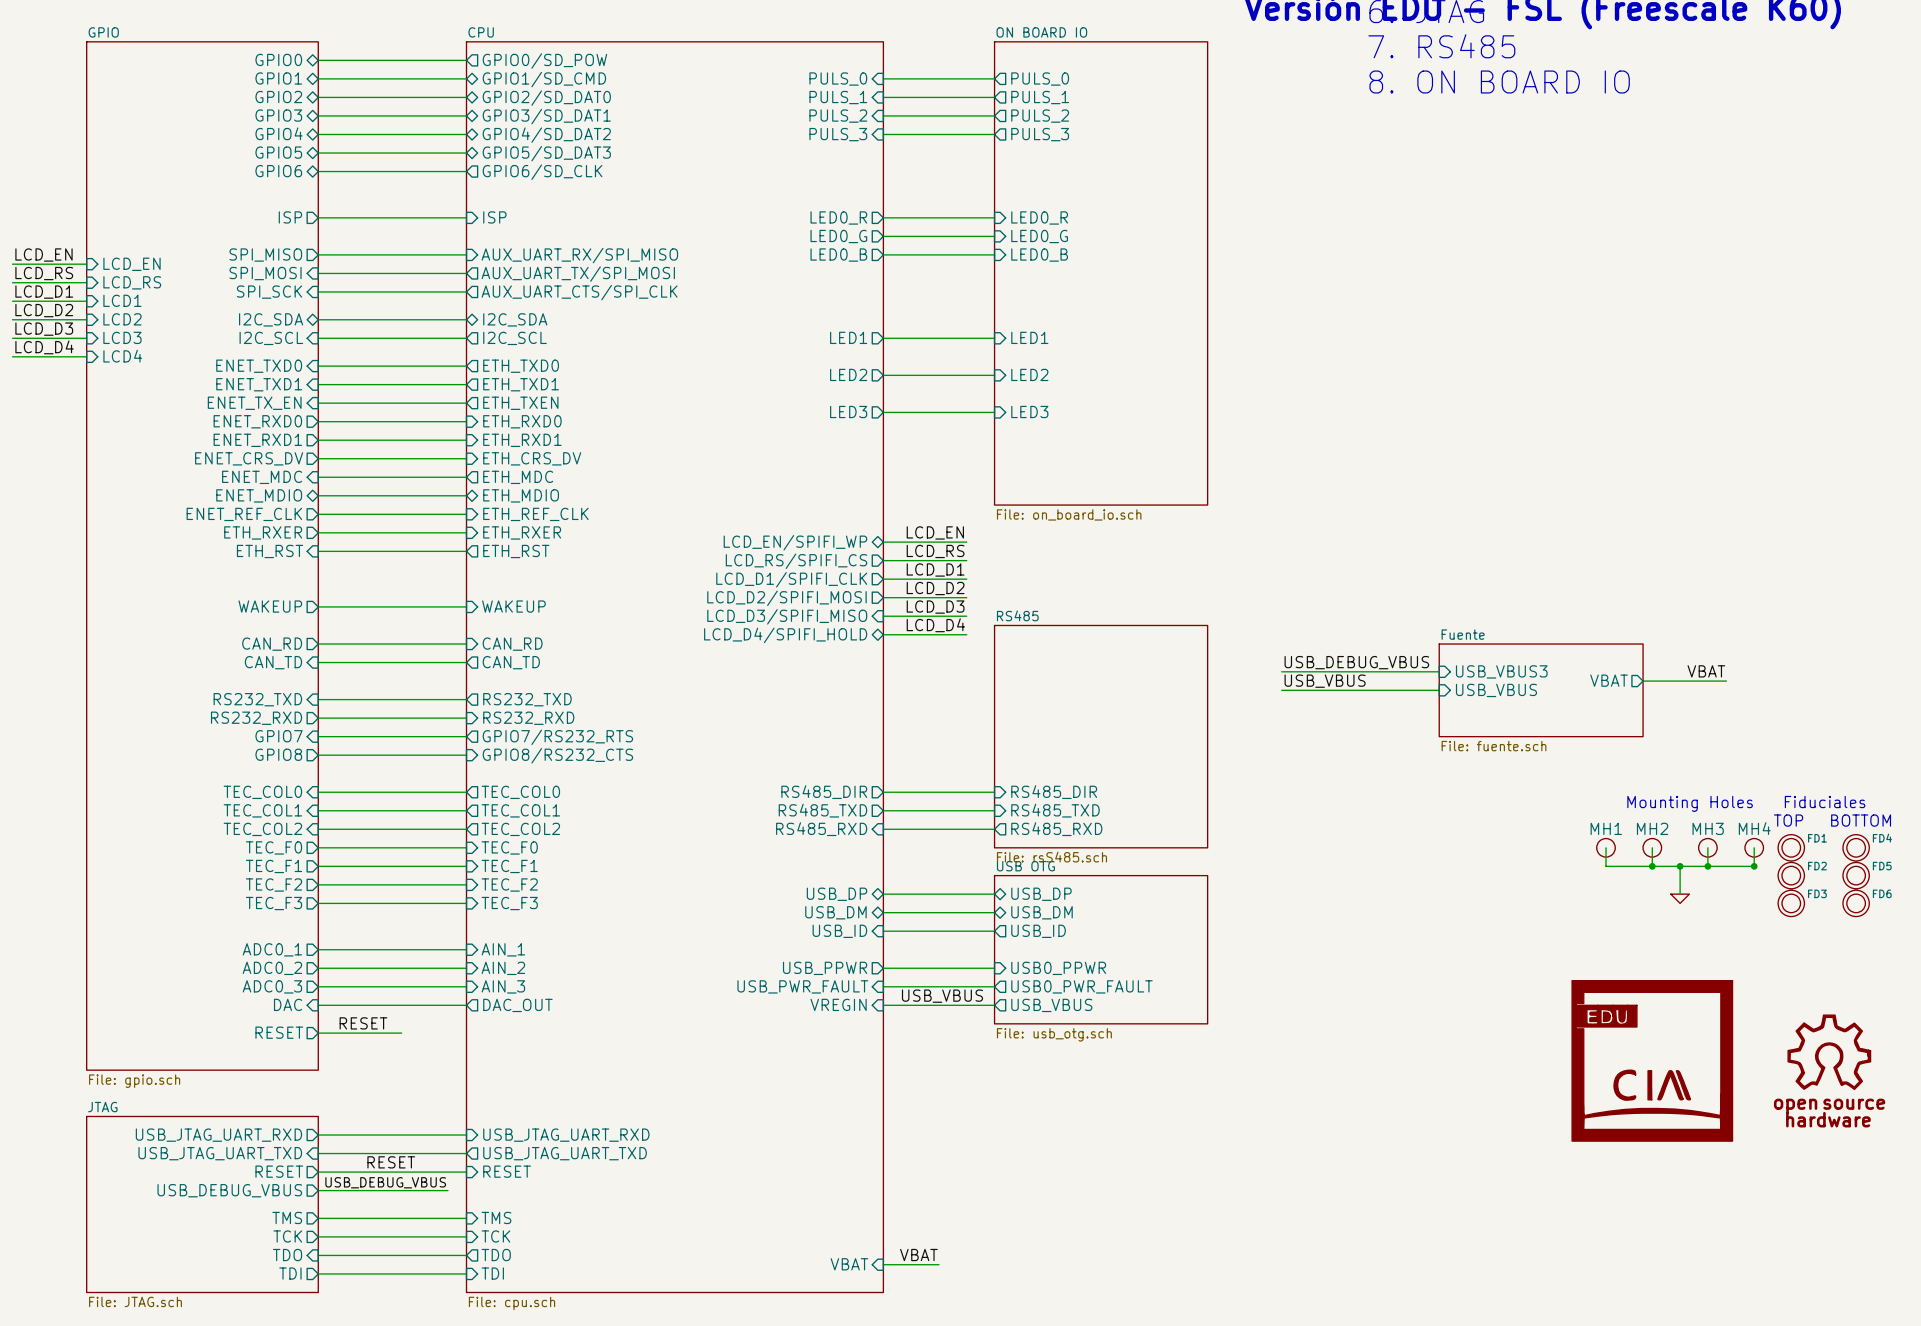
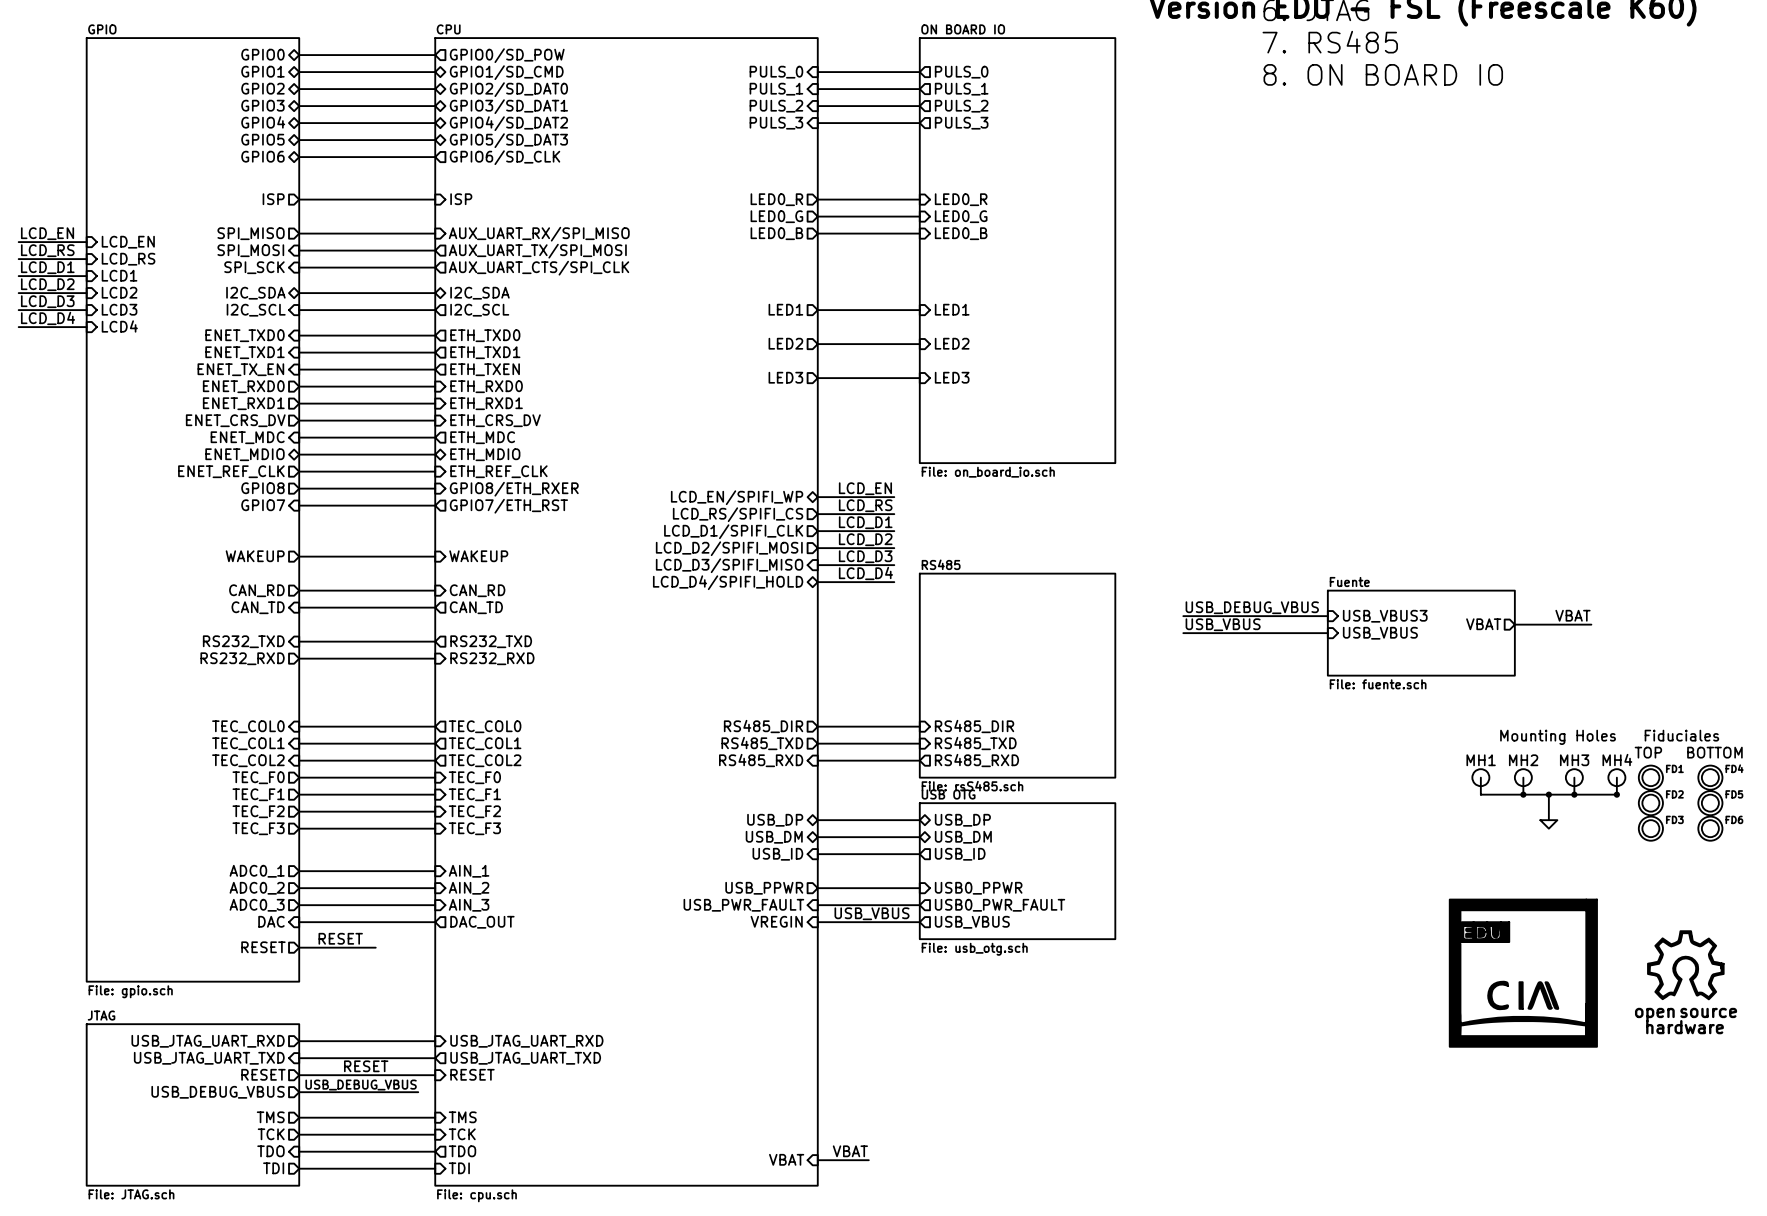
sheet pin: ETH_RXER (263, 532) -> GPIO8 (262, 488)
sheet pin: ETH_RXER (522, 532) -> GPIO8/ETH_RXER (514, 489)
sheet pin: ETH_RST (270, 551) -> GPIO7 (263, 505)
sheet pin: ETH_RST (516, 551) -> GPIO7/ETH_RST (508, 506)
sheet pin: GPIO7 (279, 736) -> none
wire: (318, 736) (466, 736) -> none
sheet pin: GPIO7/RS232_RTS (557, 737) -> none
sheet pin: GPIO8 (278, 754) -> none
wire: (318, 755) (466, 755) -> none
sheet pin: GPIO8/RS232_CTS (557, 755) -> none

